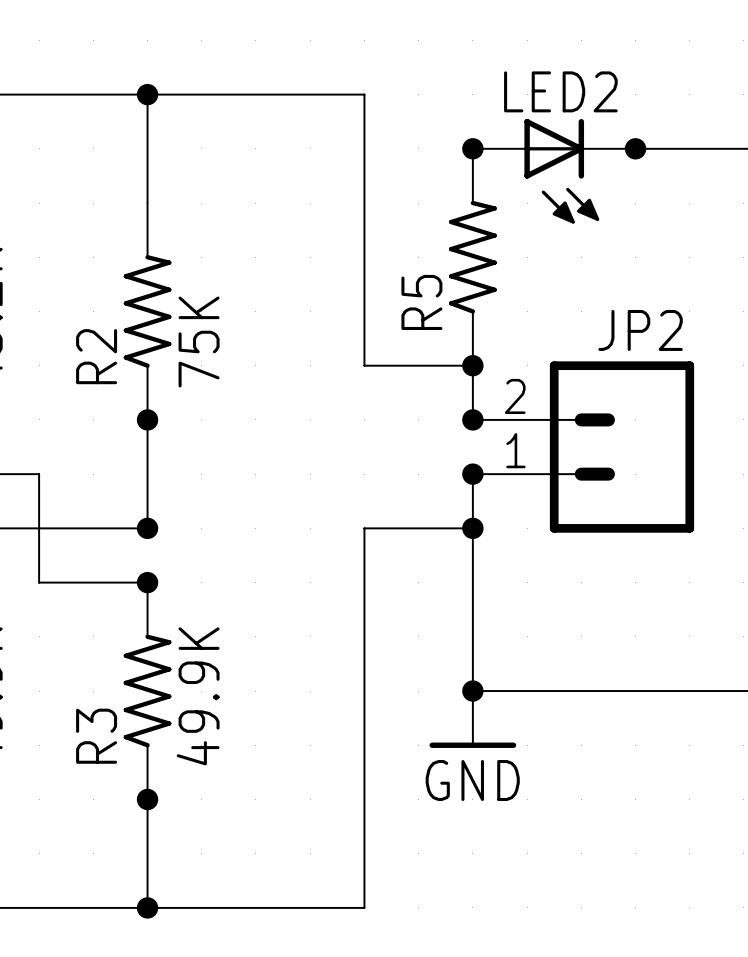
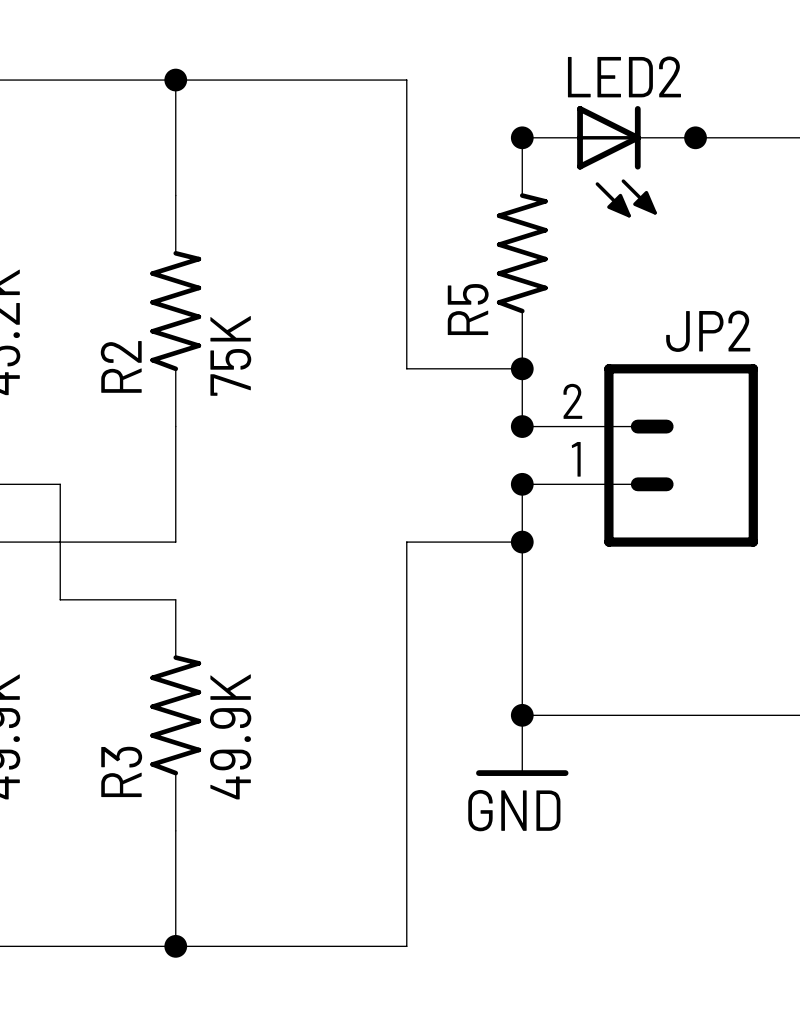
junction: (147, 419) -> none
junction: (147, 528) -> none
junction: (147, 582) -> none
junction: (147, 799) -> none

